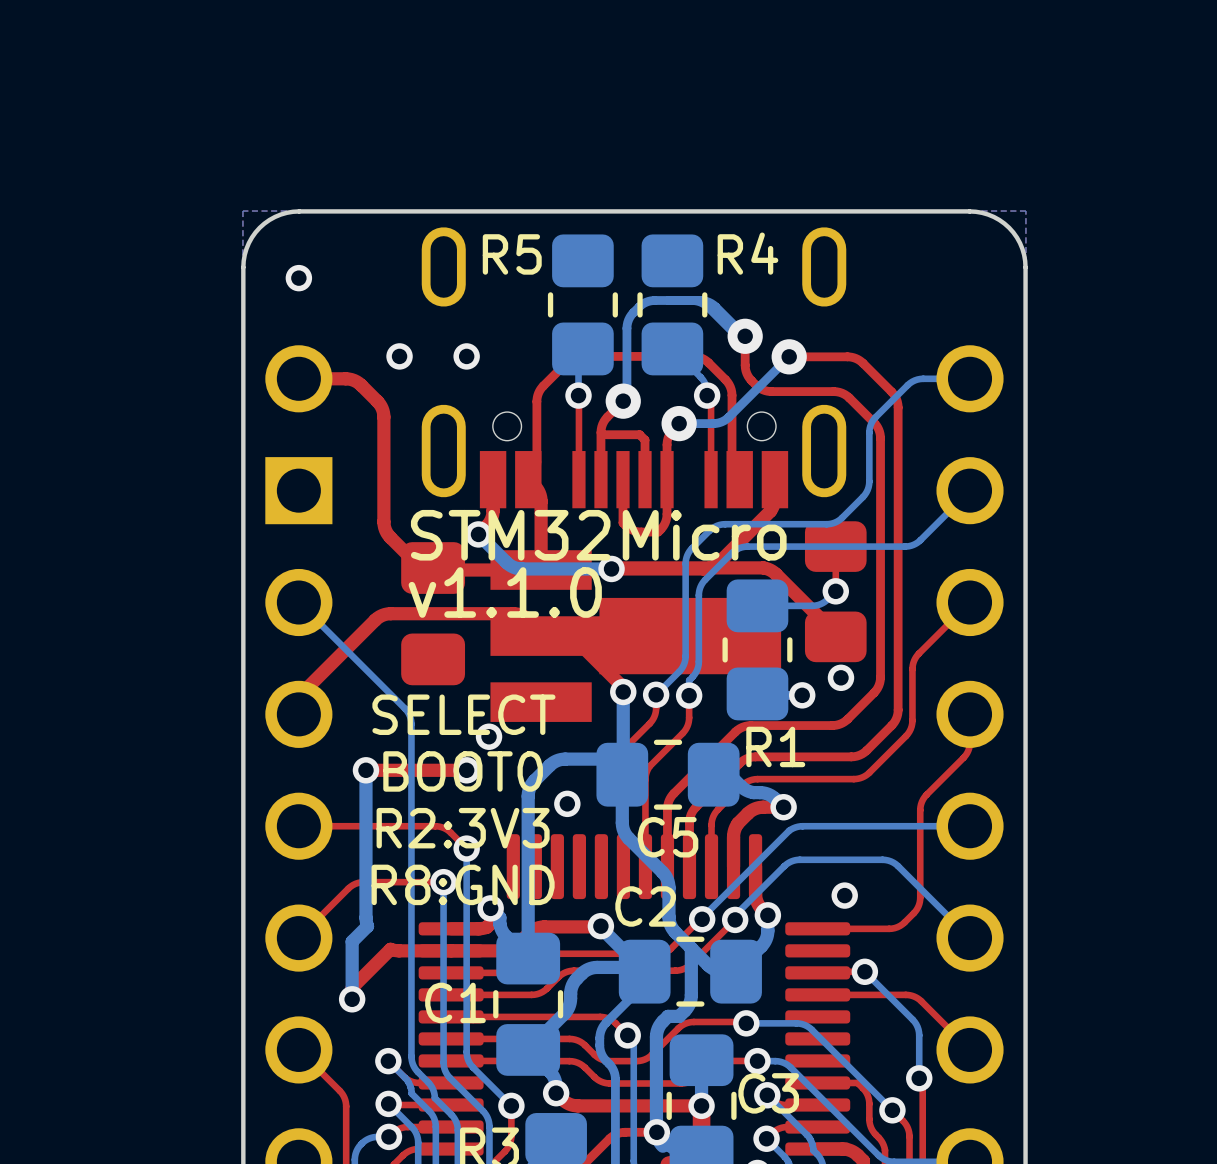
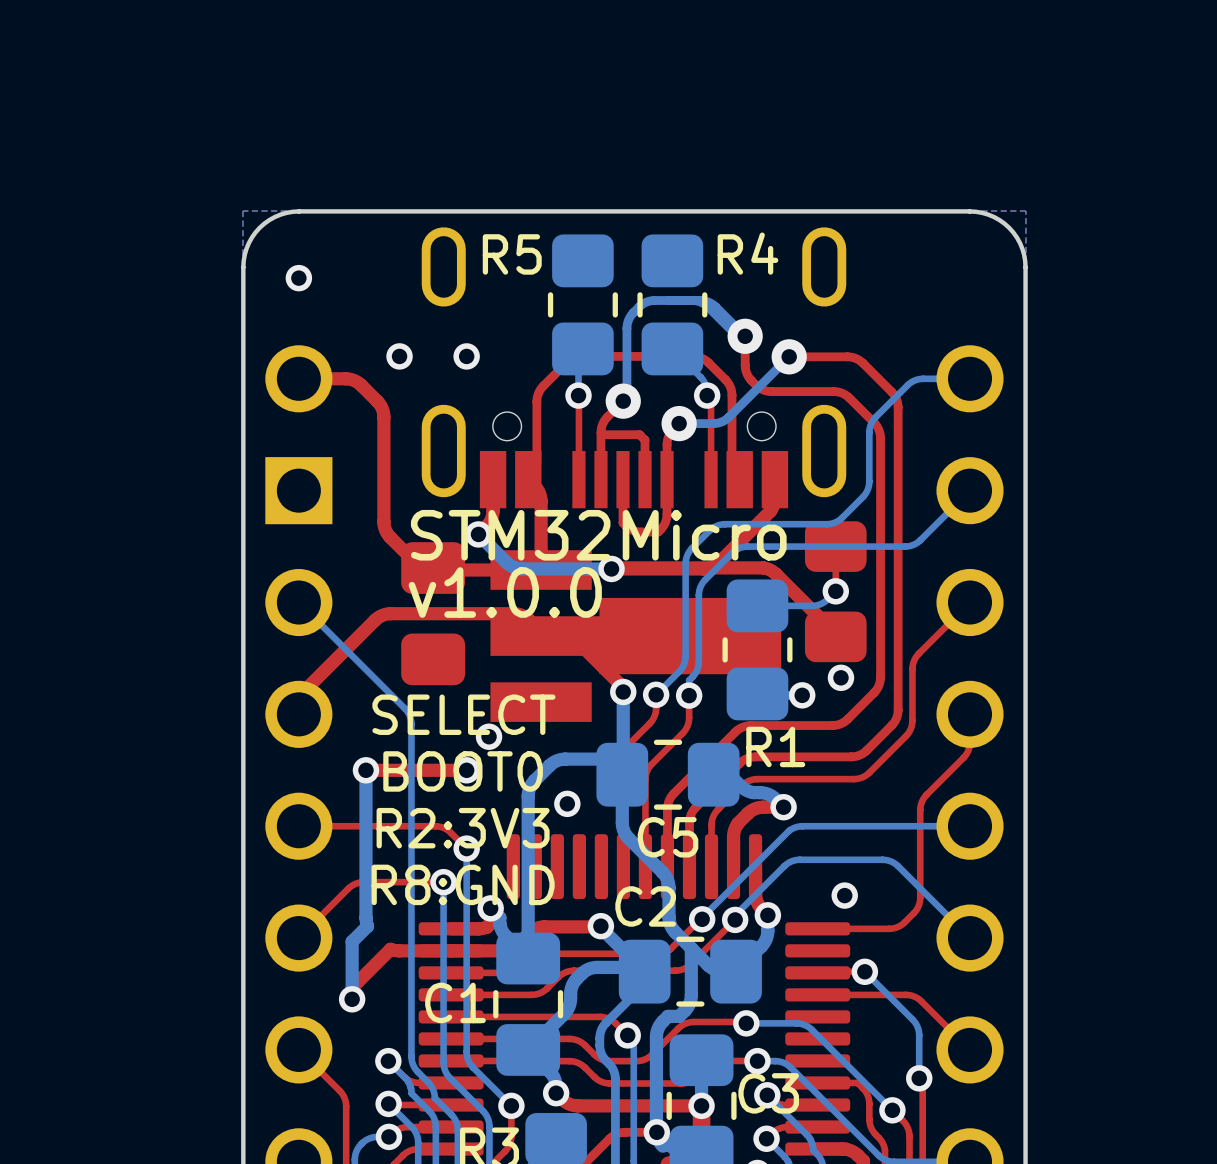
text: v1.1.0 (505, 592) -> v1.0.0 (505, 592)

